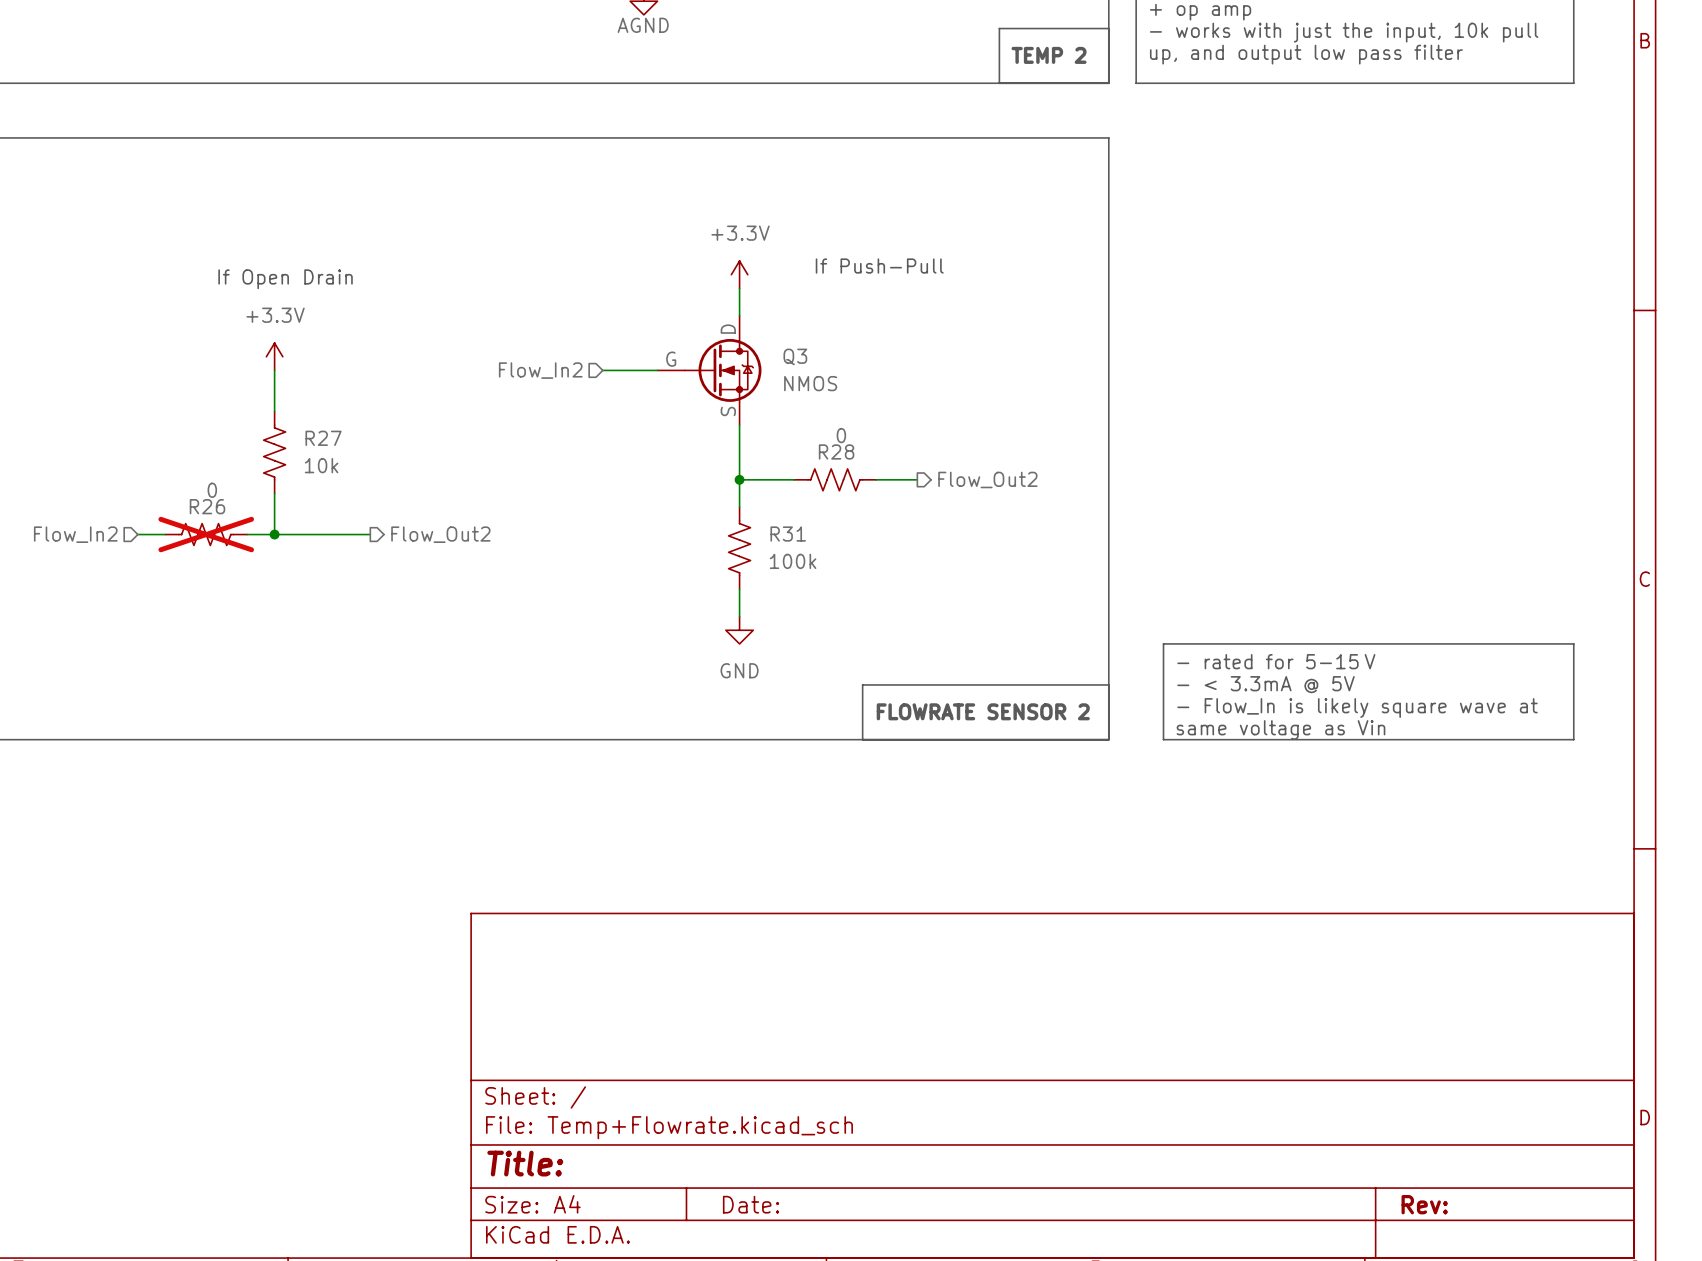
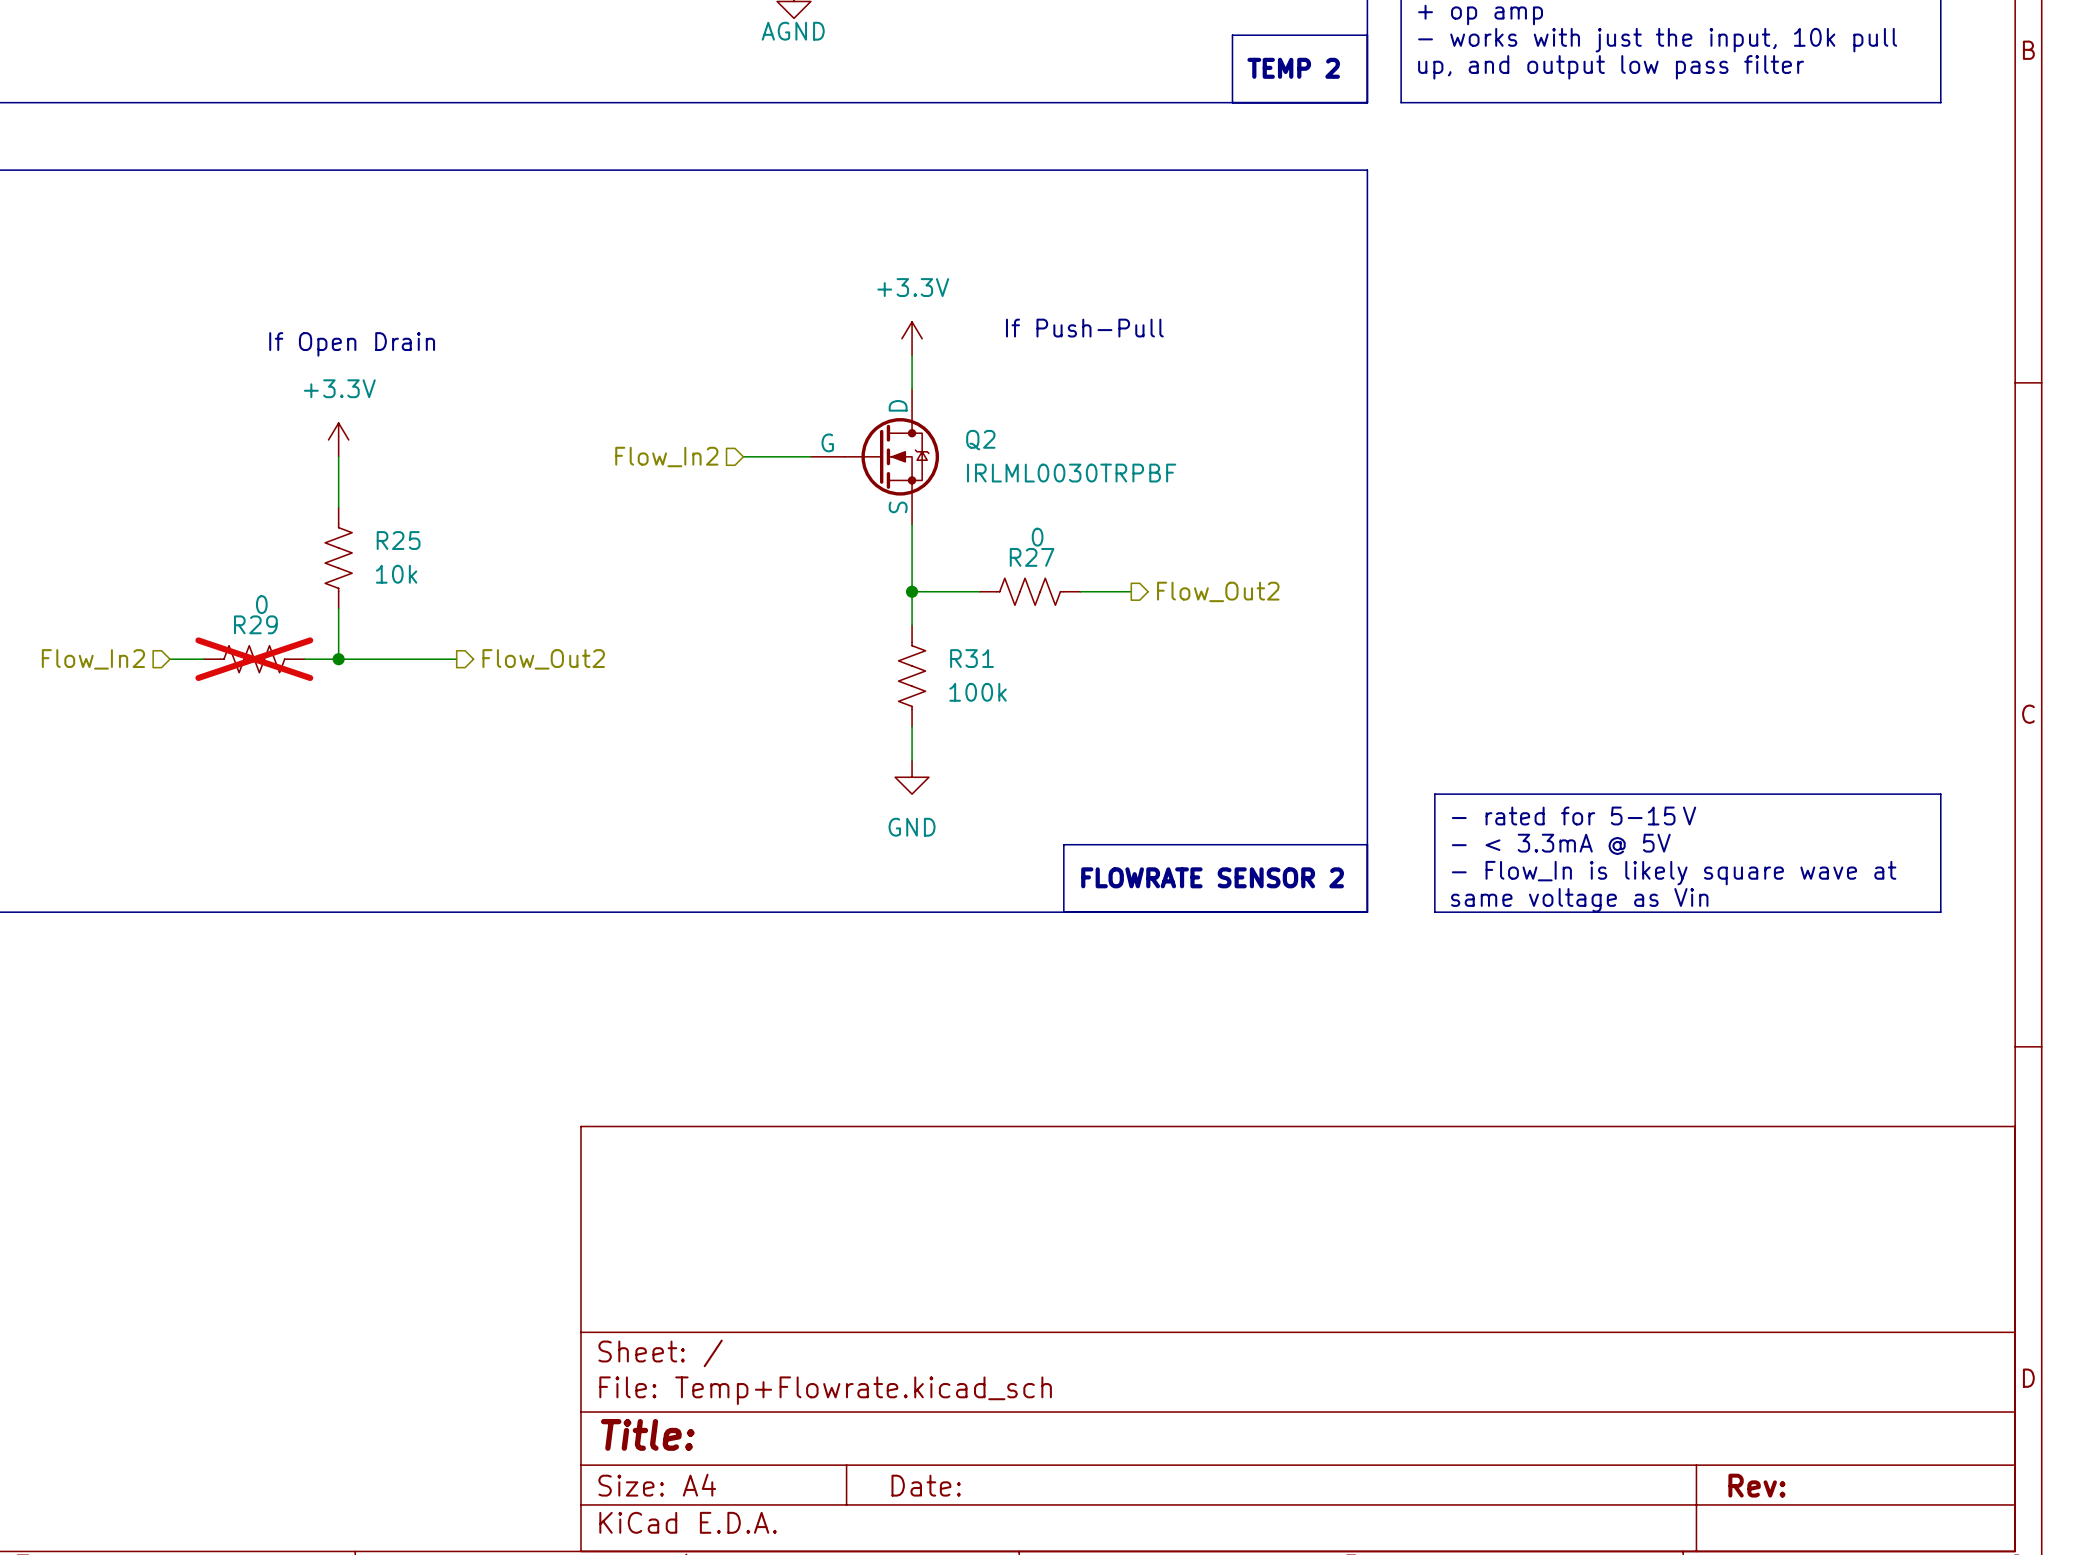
Q3 name: Q3 (795, 356) -> Q2 (980, 440)
Q3 value: NMOS (810, 383) -> IRLML0030TRPBF (1071, 473)
R27 name: R27 (323, 438) -> R25 (398, 540)
R28 name: R28 (836, 451) -> R27 (1032, 557)
R26 name: R26 (207, 506) -> R29 (255, 624)

